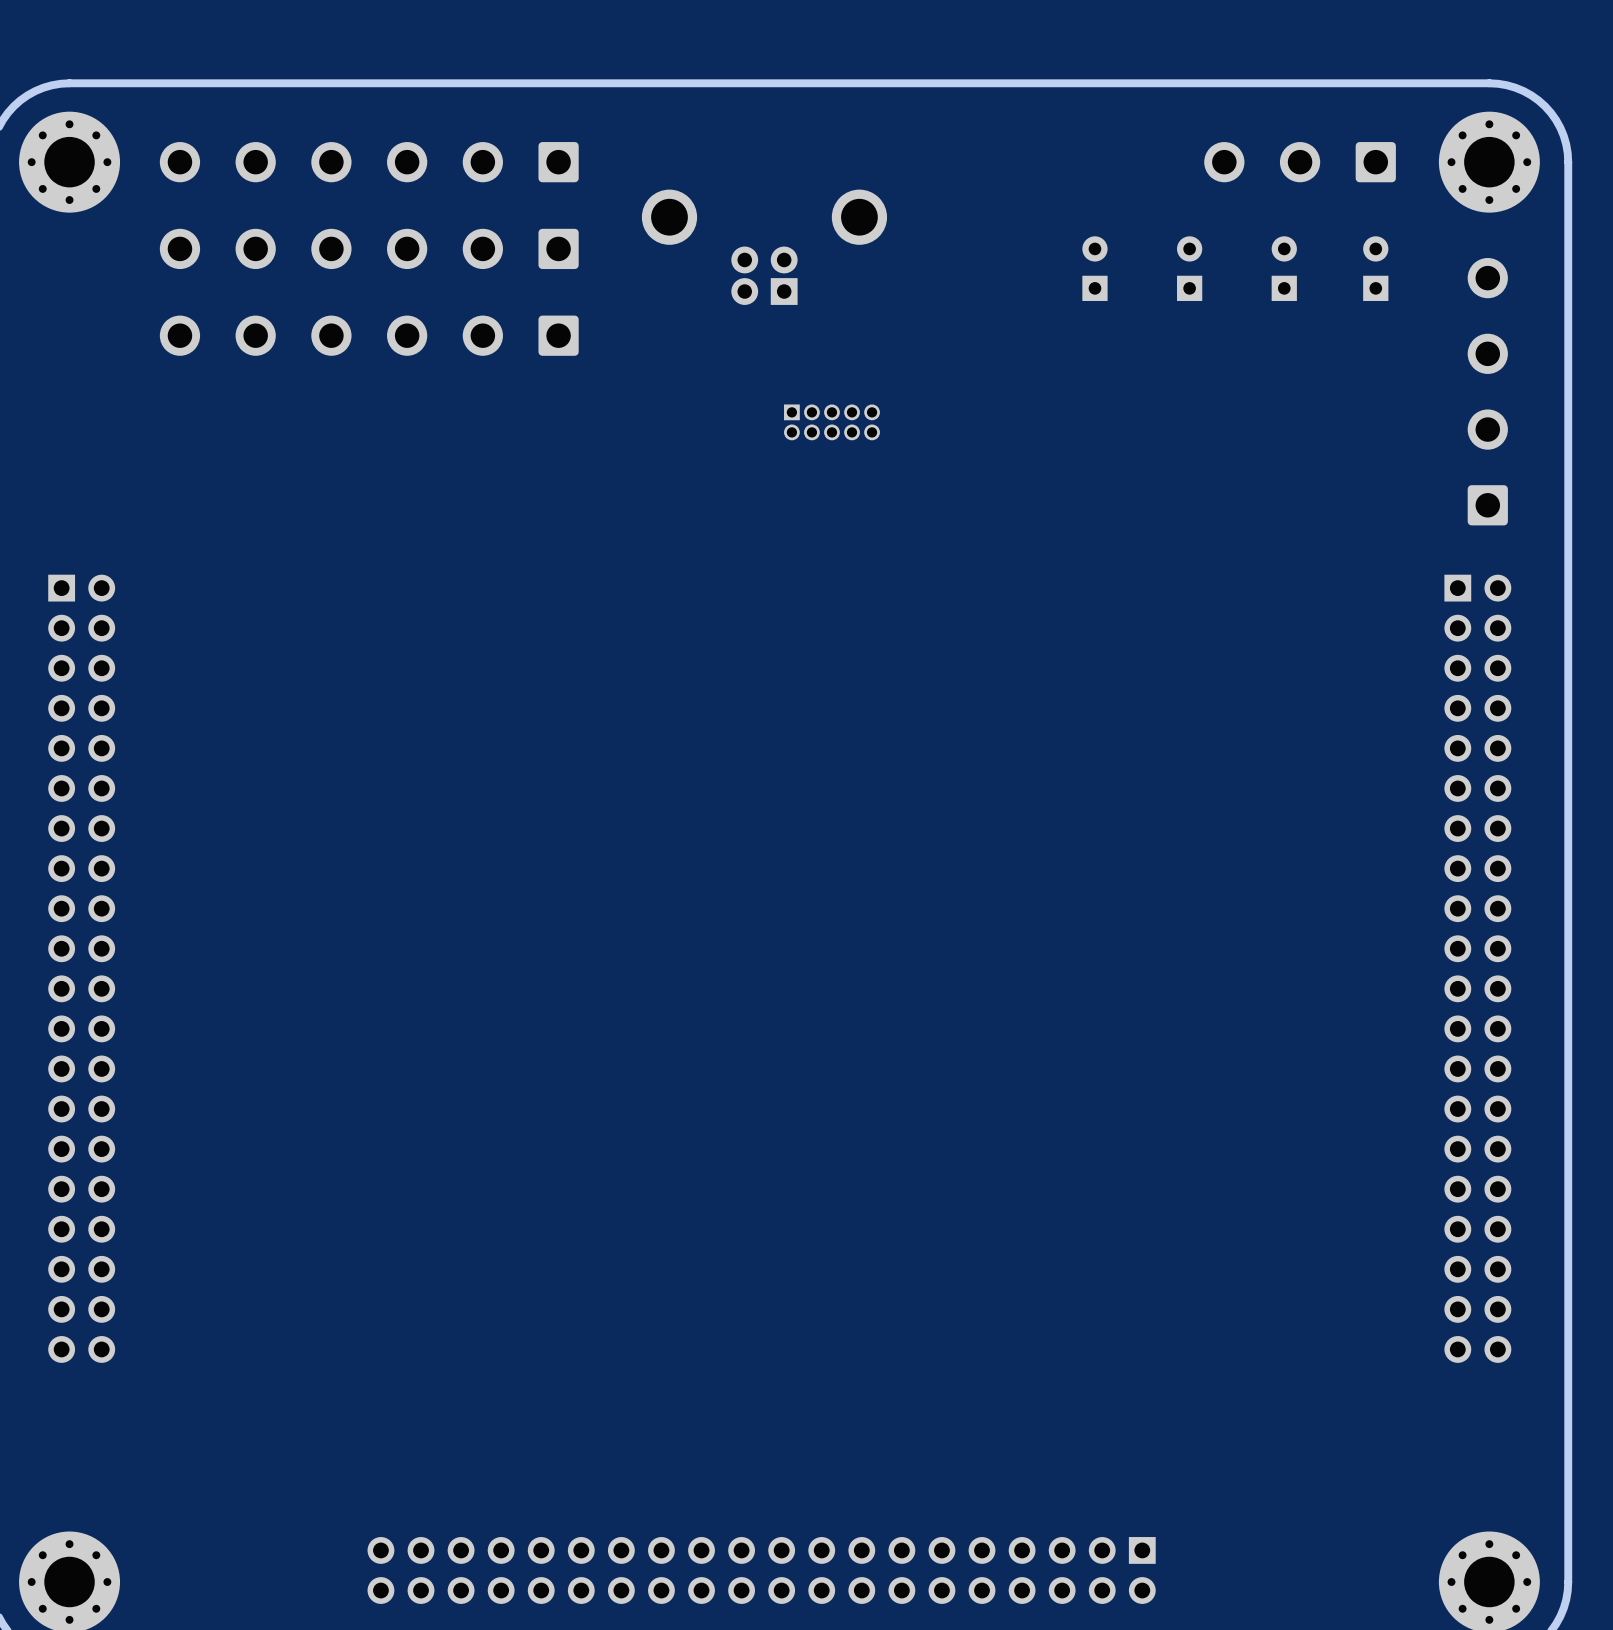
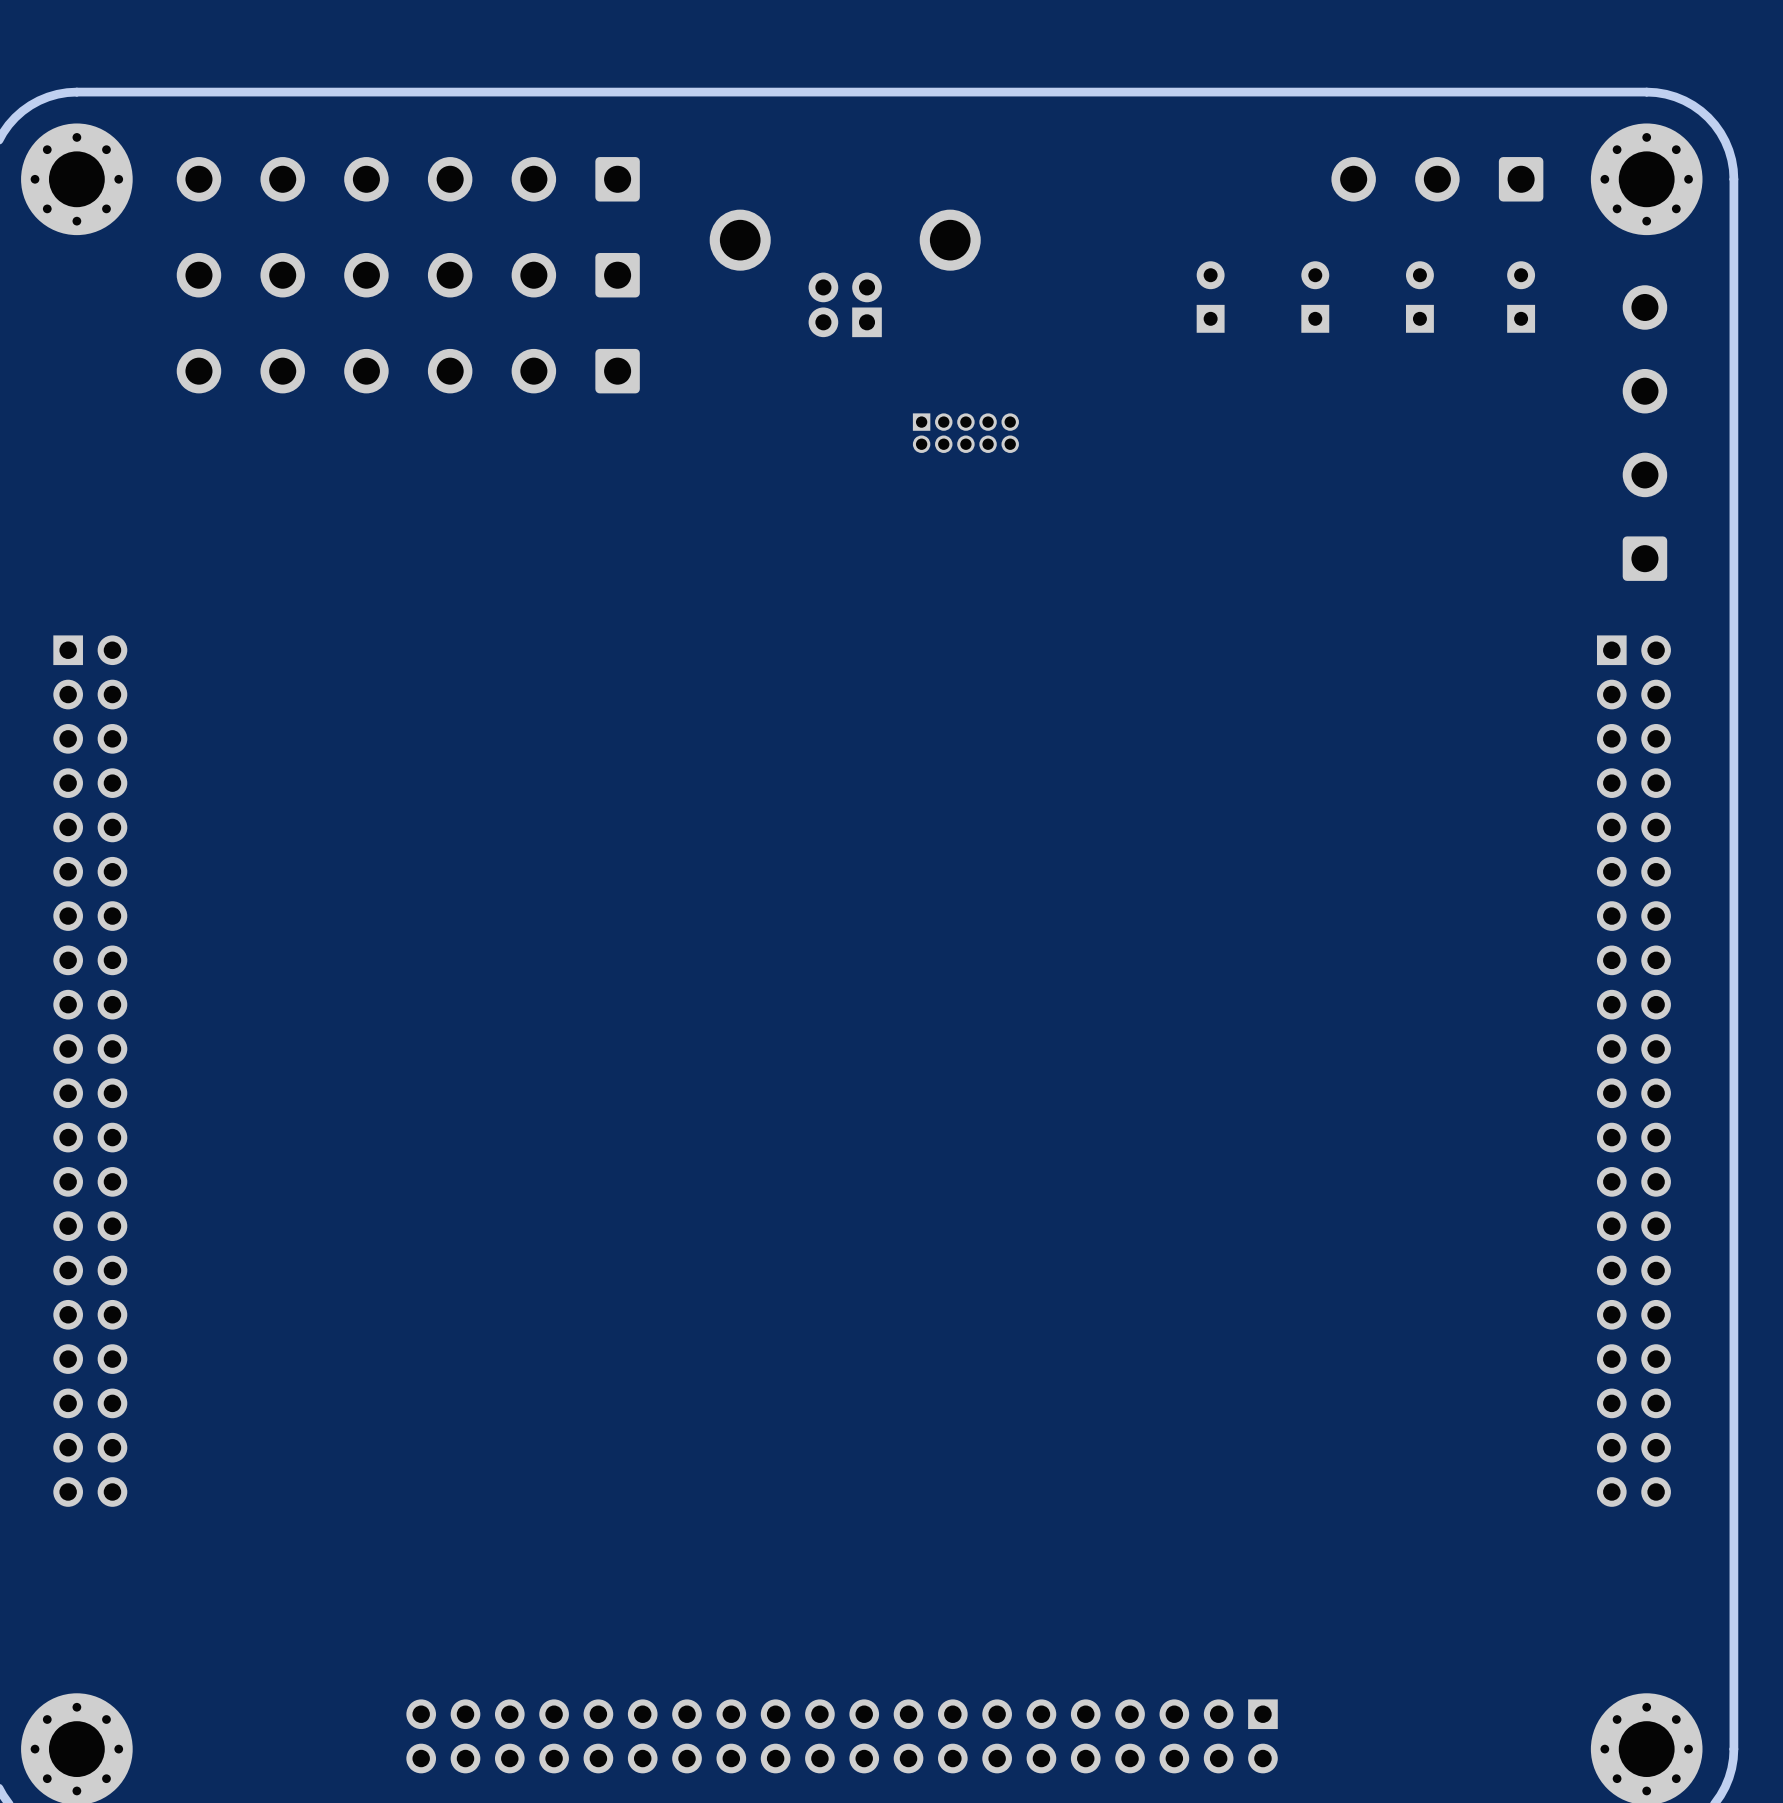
part position: (831, 422) -> (965, 433)

